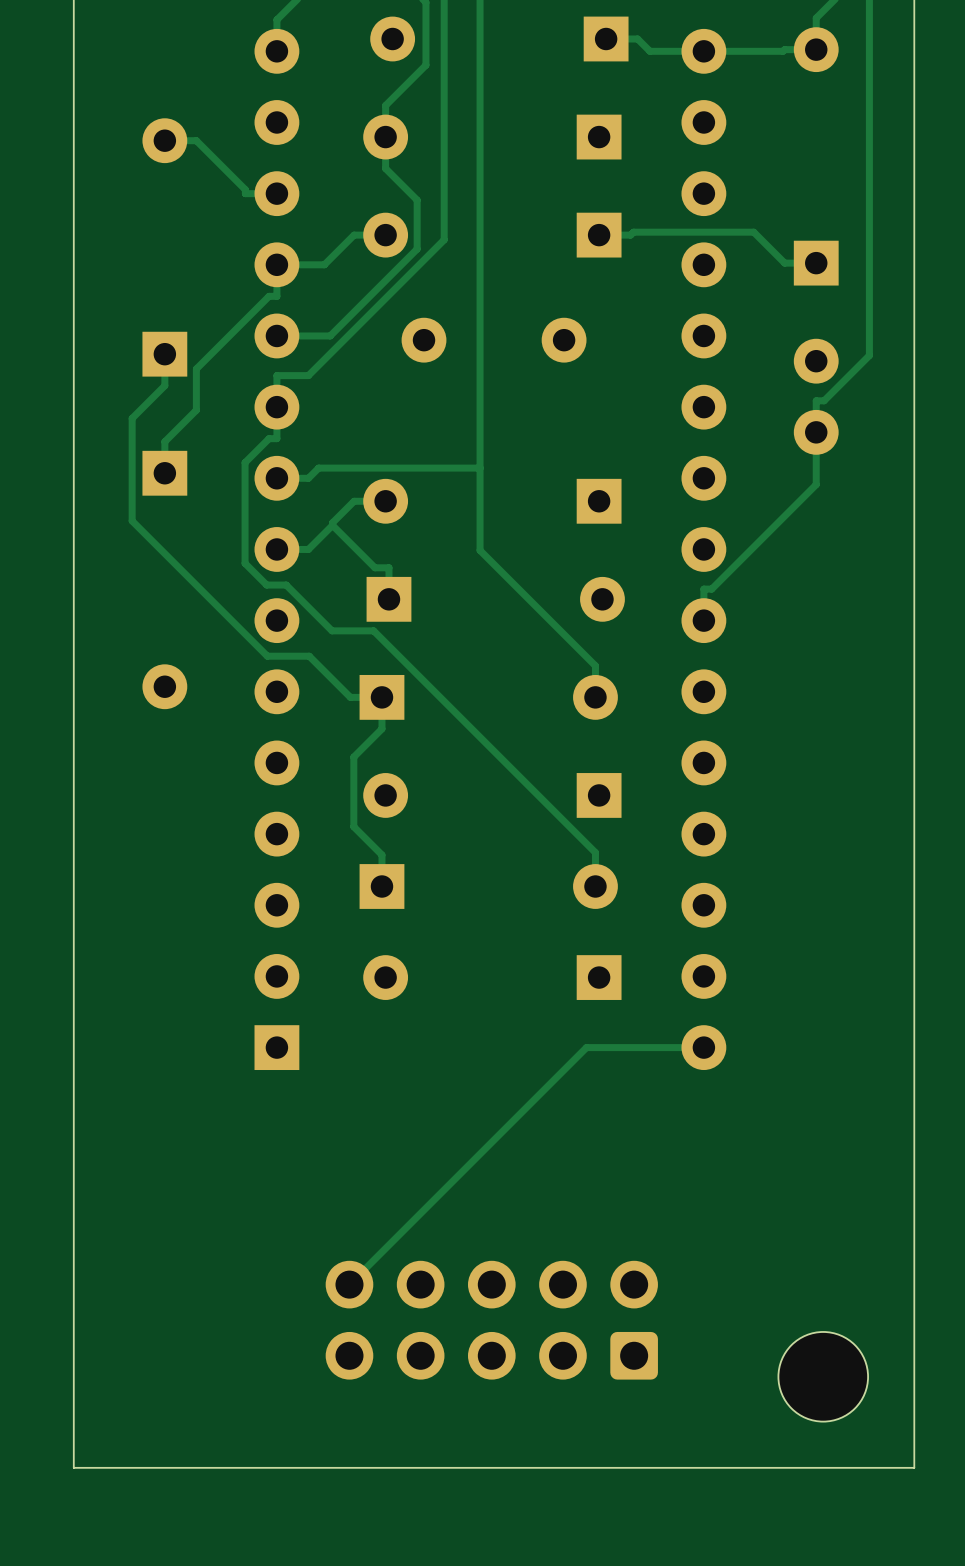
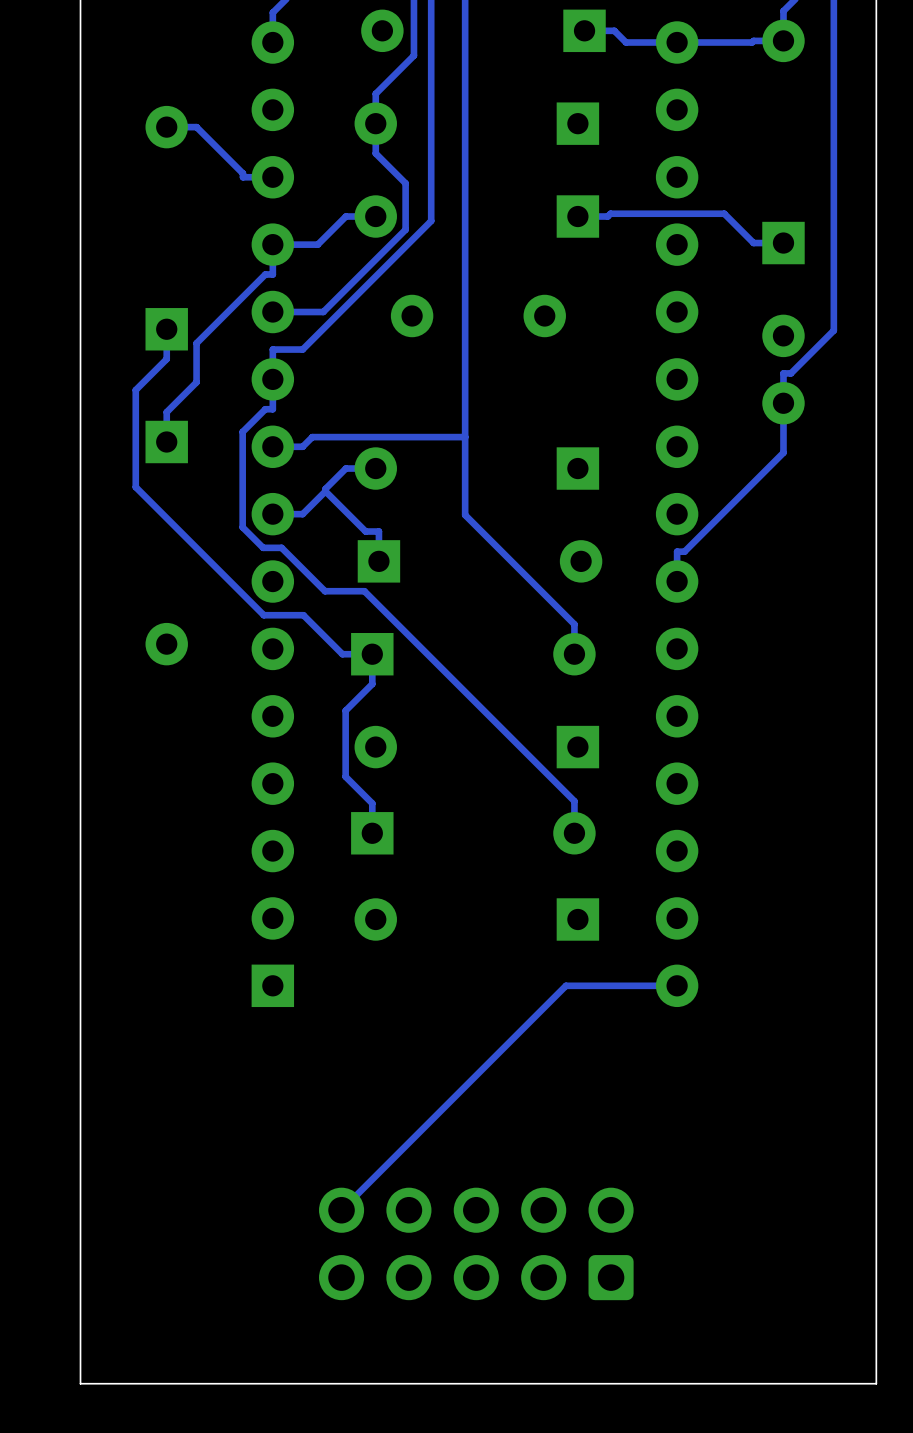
part: (823, 1376) -> none

